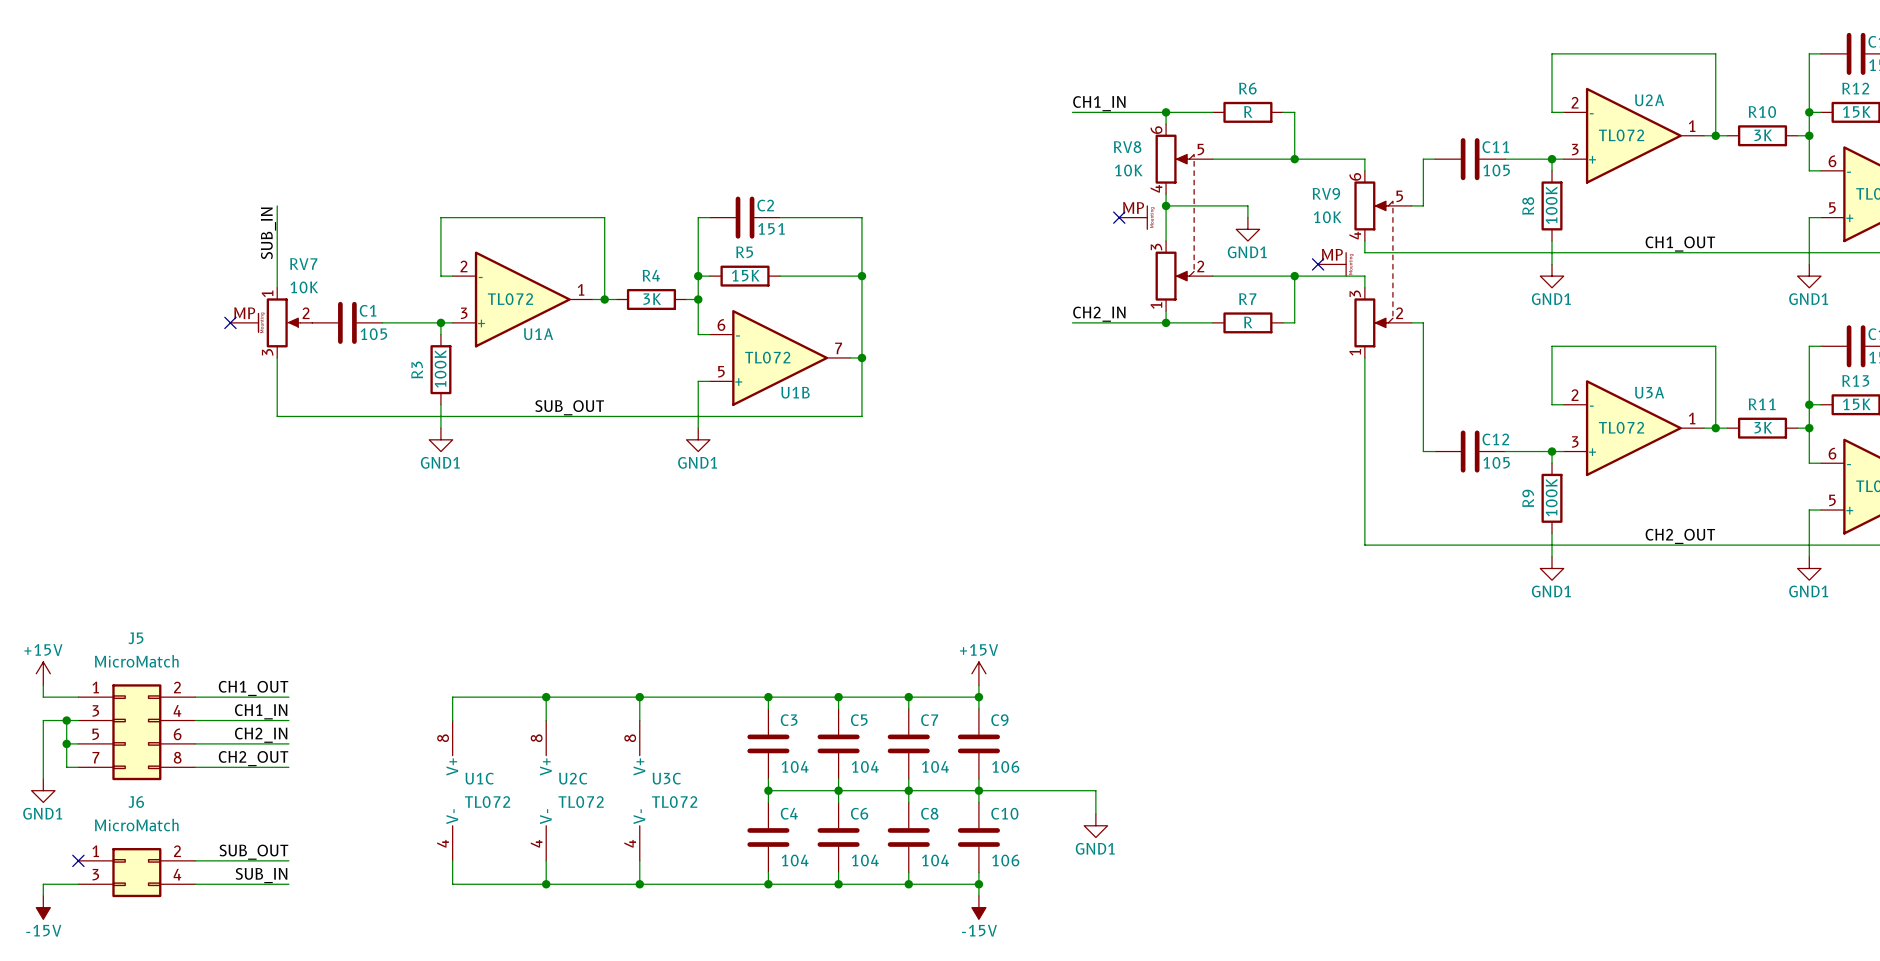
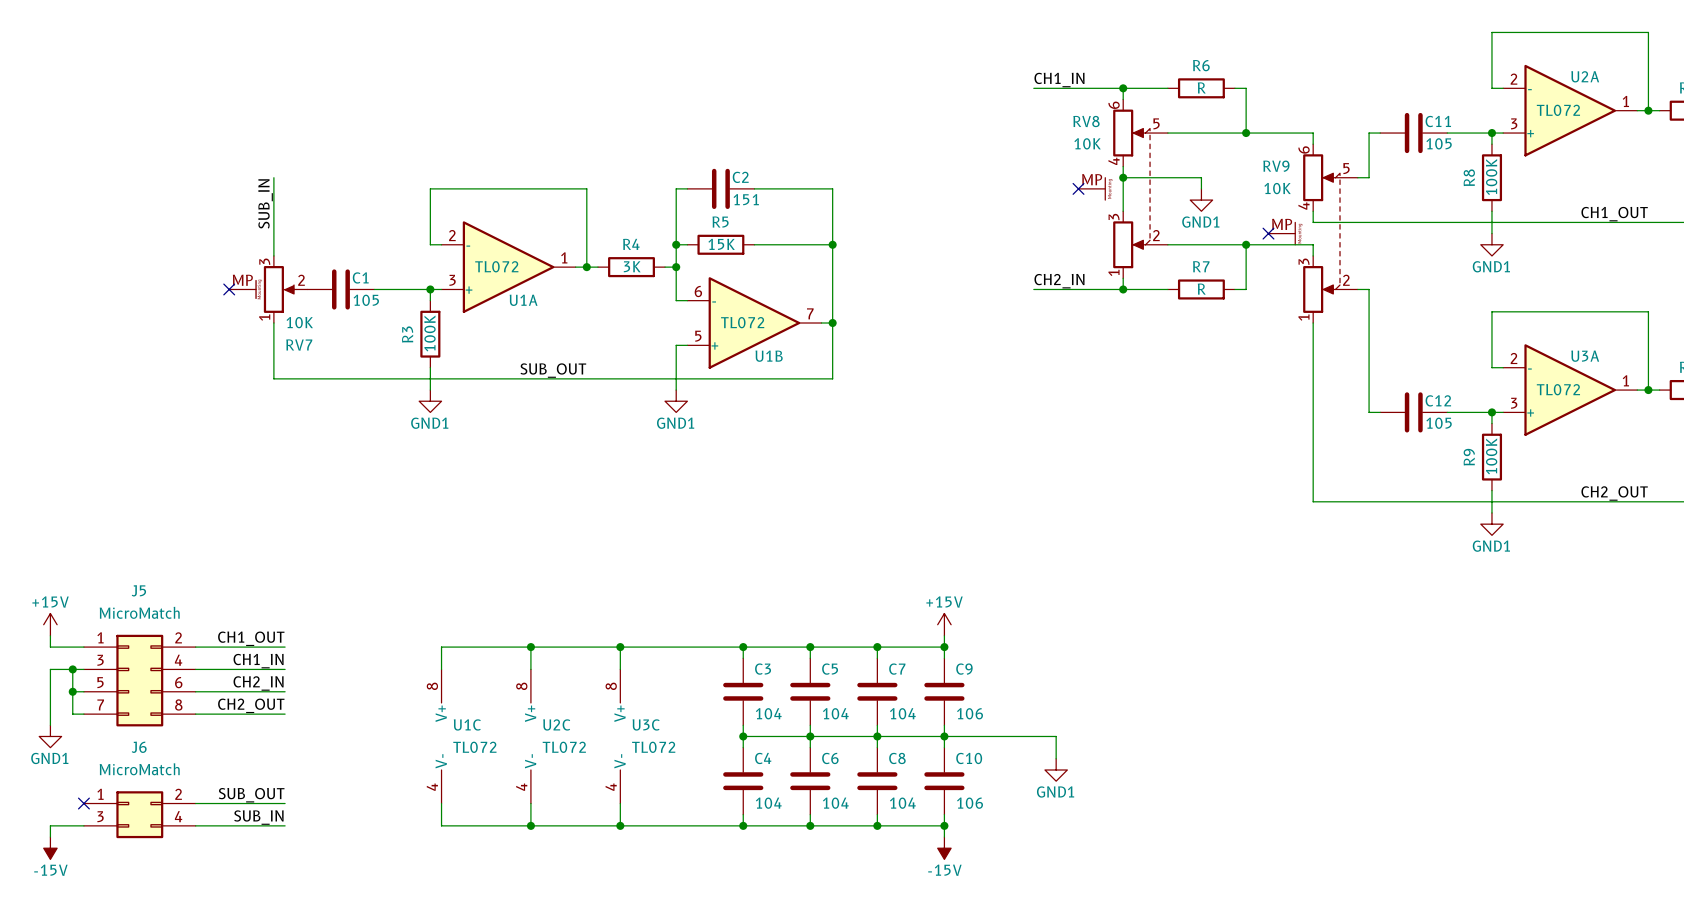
RV7 flip: as is (279, 322) -> up-down (275, 289)

